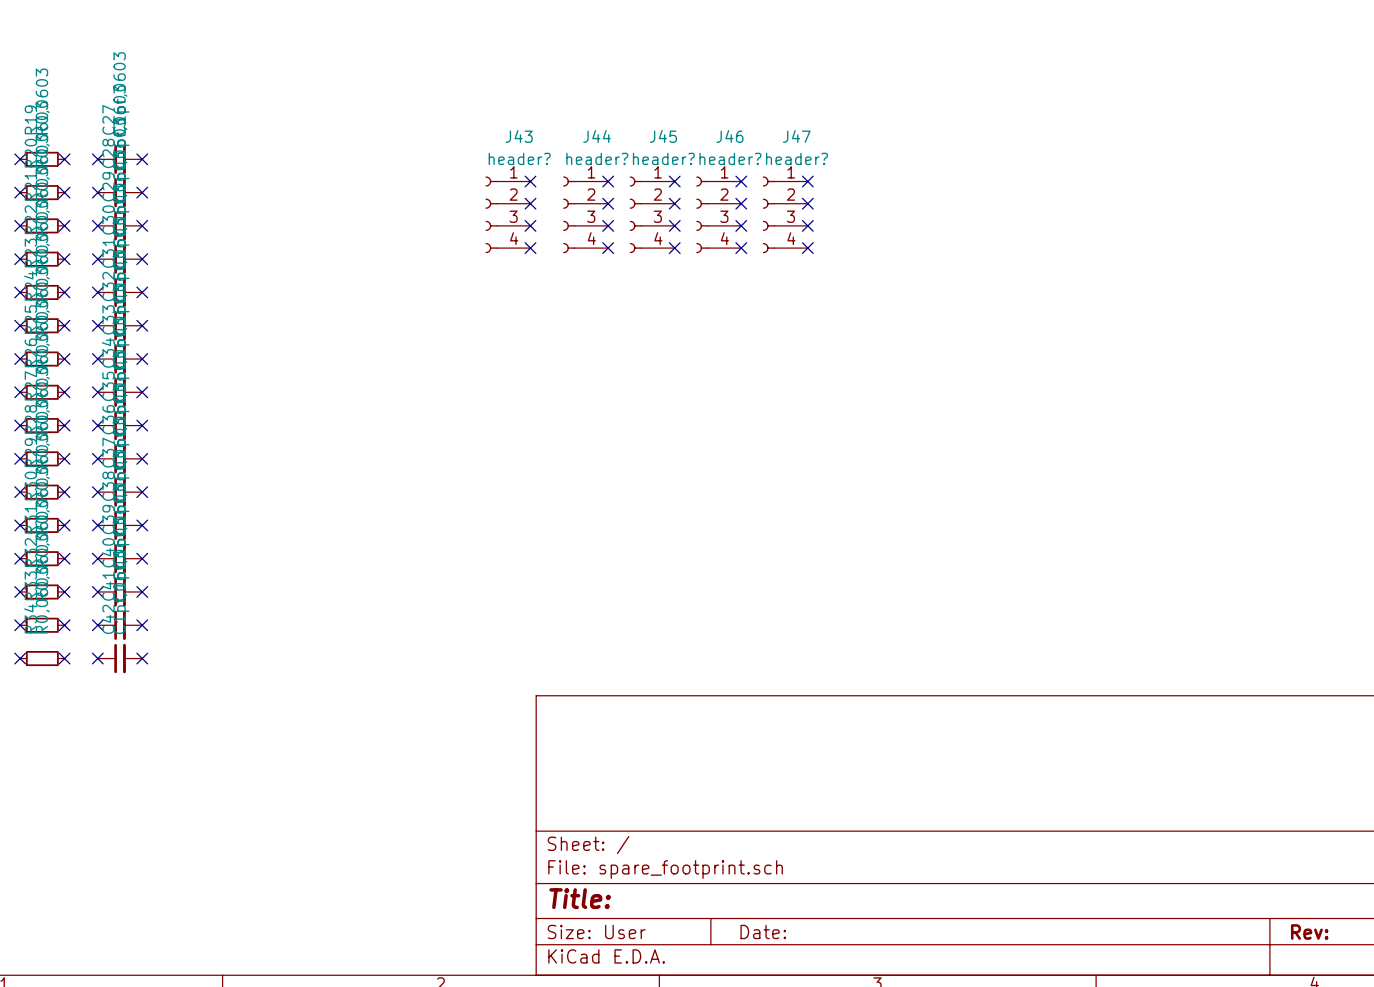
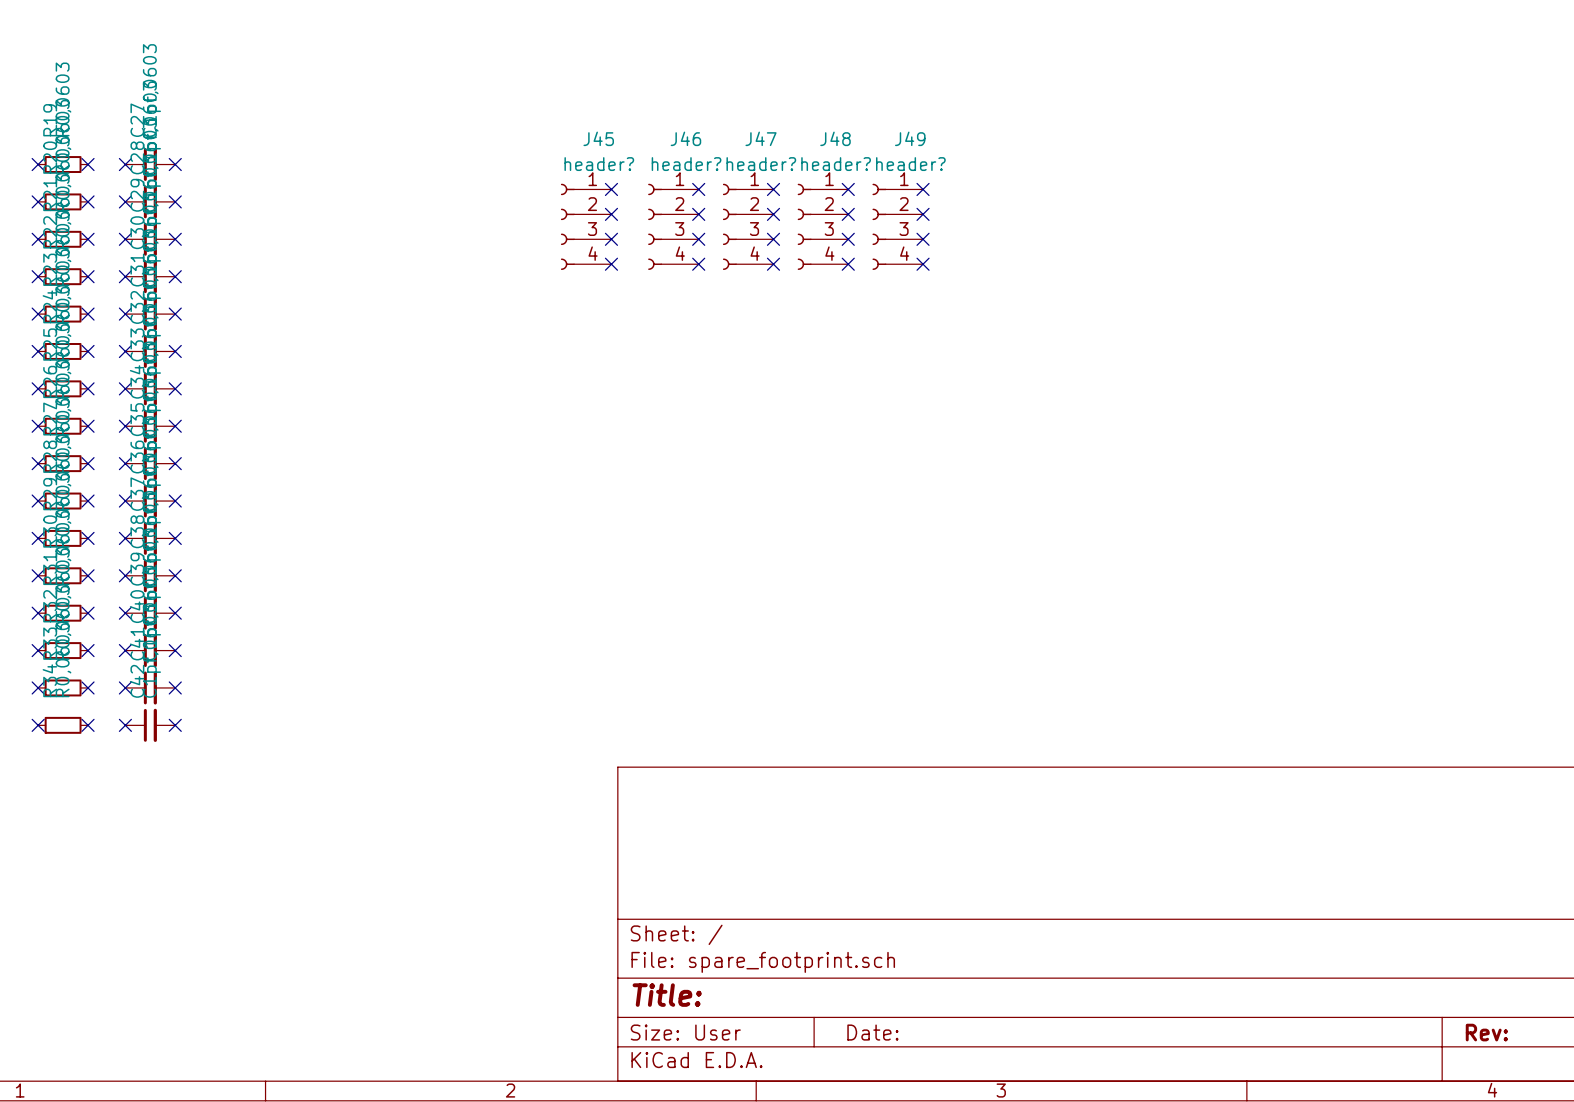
J43 name: J43 (519, 136) -> J45 (598, 138)
J44 name: J44 (597, 136) -> J46 (685, 138)
J45 name: J45 (663, 136) -> J47 (761, 138)
J46 name: J46 (729, 136) -> J48 (835, 138)
J47 name: J47 (796, 136) -> J49 (910, 138)

